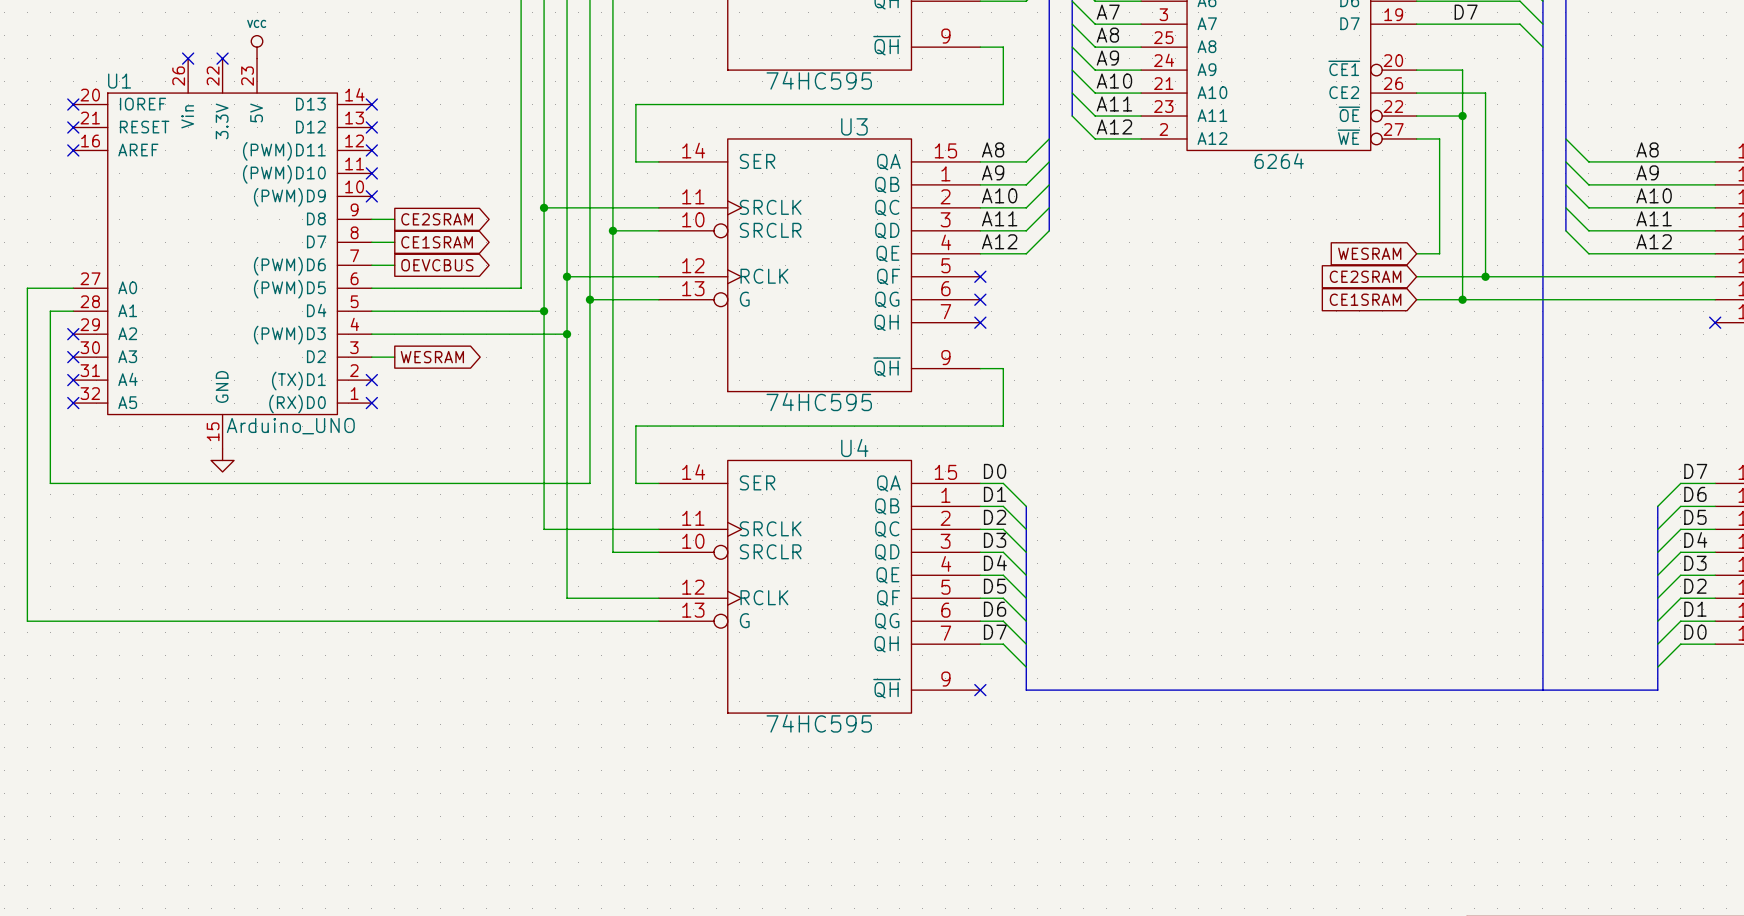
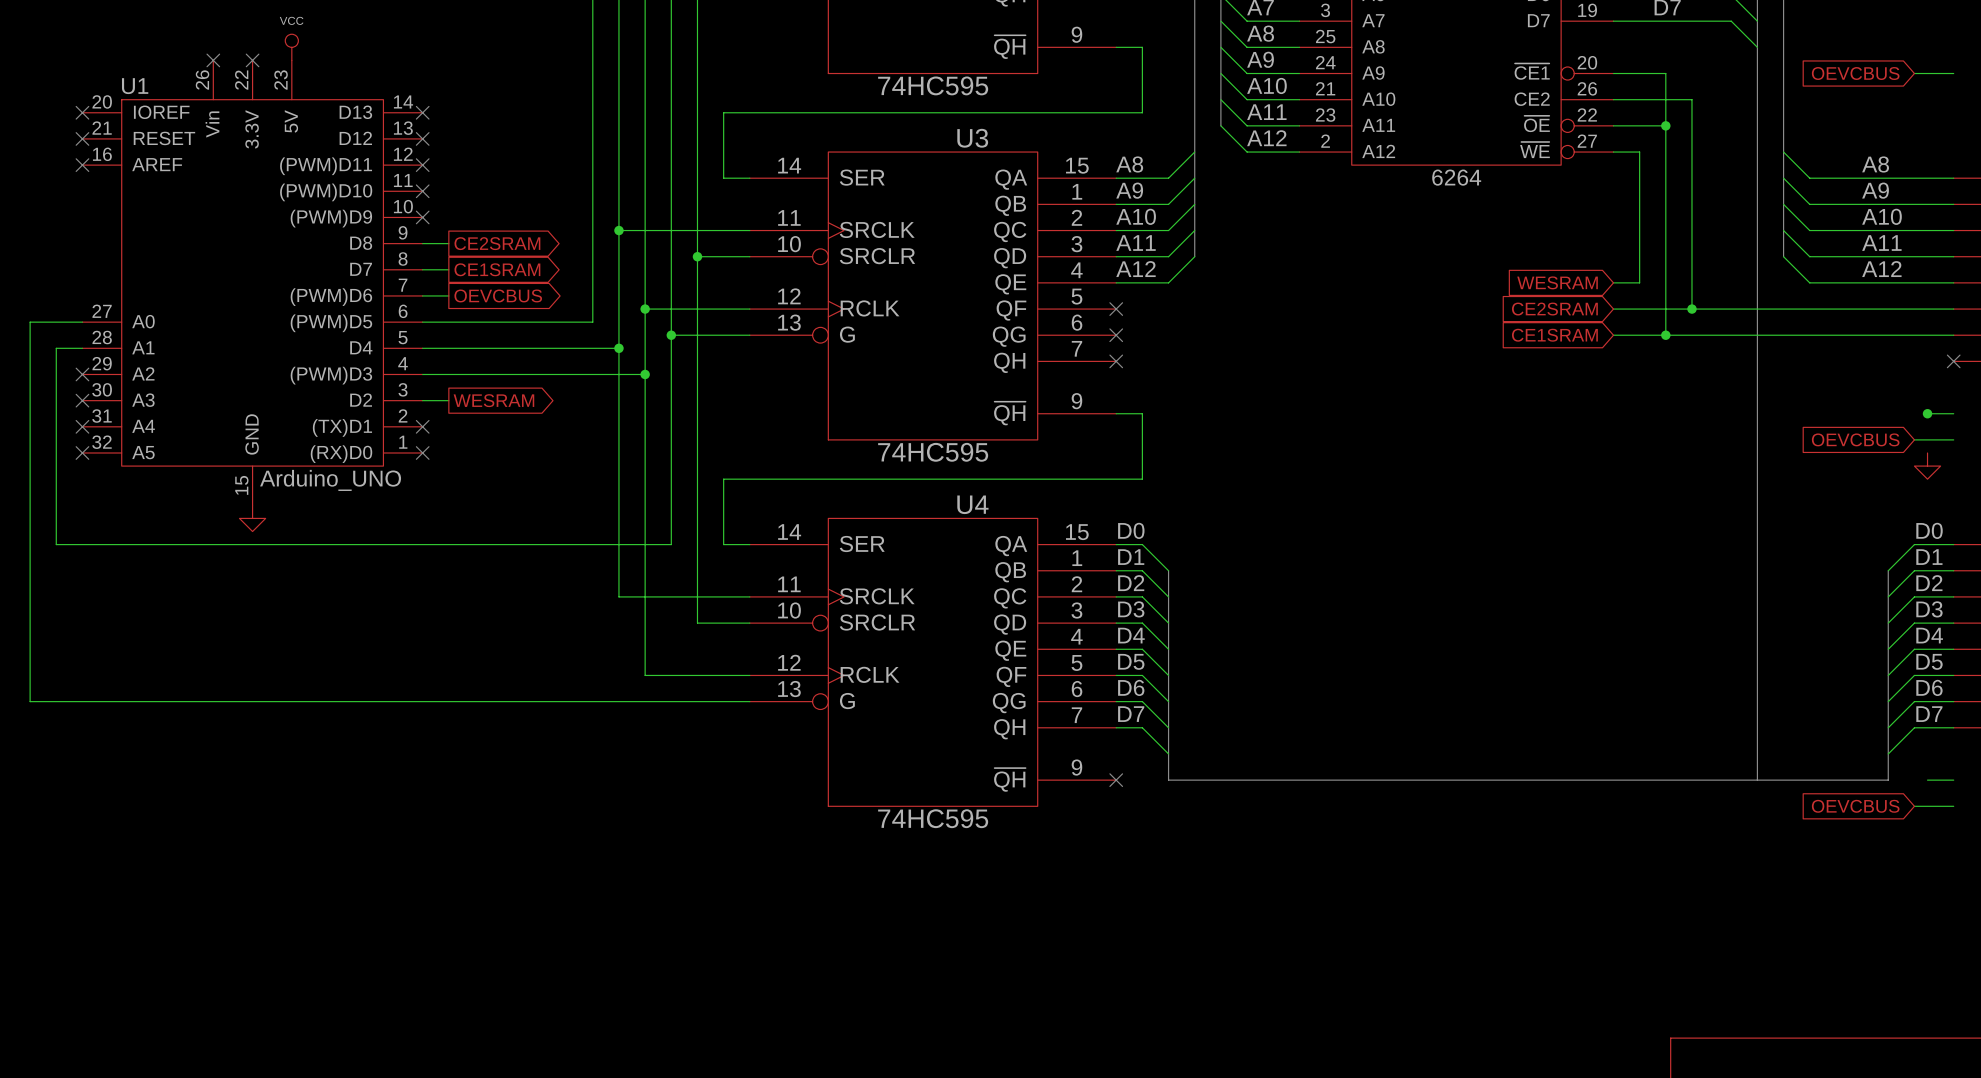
global label: none -> OEVCBUS (1855, 73)
wire: none -> (1914, 73) (1953, 73)
wire: none -> (1927, 413) (1953, 413)
junction: none -> (1927, 413)
global label: none -> OEVCBUS (1855, 439)
wire: none -> (1914, 439) (1953, 439)
power symbol: none -> (1927, 466)
label: D7 (1695, 471) -> D0 (1929, 530)
label: D6 (1695, 494) -> D1 (1929, 557)
label: D5 (1695, 517) -> D2 (1929, 583)
label: D4 (1695, 539) -> D3 (1929, 609)
label: D3 (1695, 563) -> D4 (1929, 635)
label: D2 (1695, 586) -> D5 (1929, 661)
label: D1 (1695, 609) -> D6 (1929, 687)
label: D0 (1695, 632) -> D7 (1929, 714)
wire: none -> (1927, 780) (1953, 780)
global label: none -> OEVCBUS (1855, 806)
wire: none -> (1914, 806) (1953, 806)

